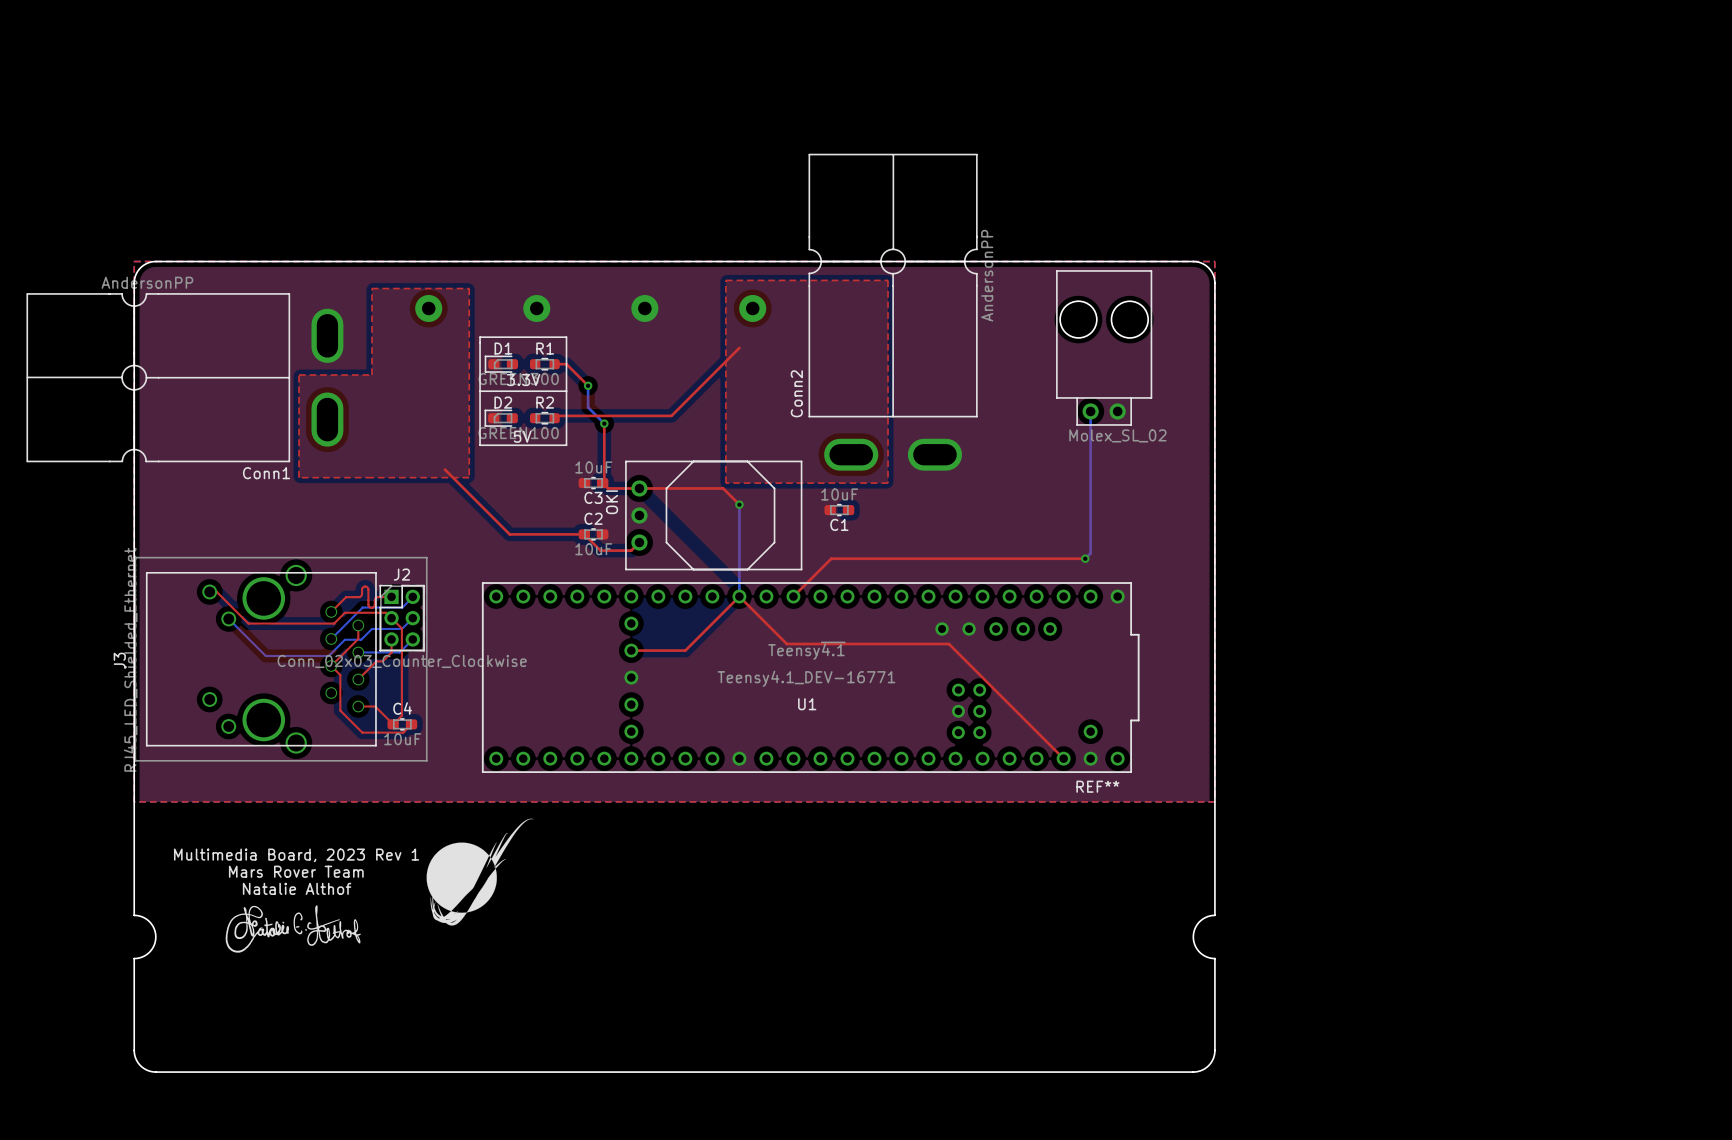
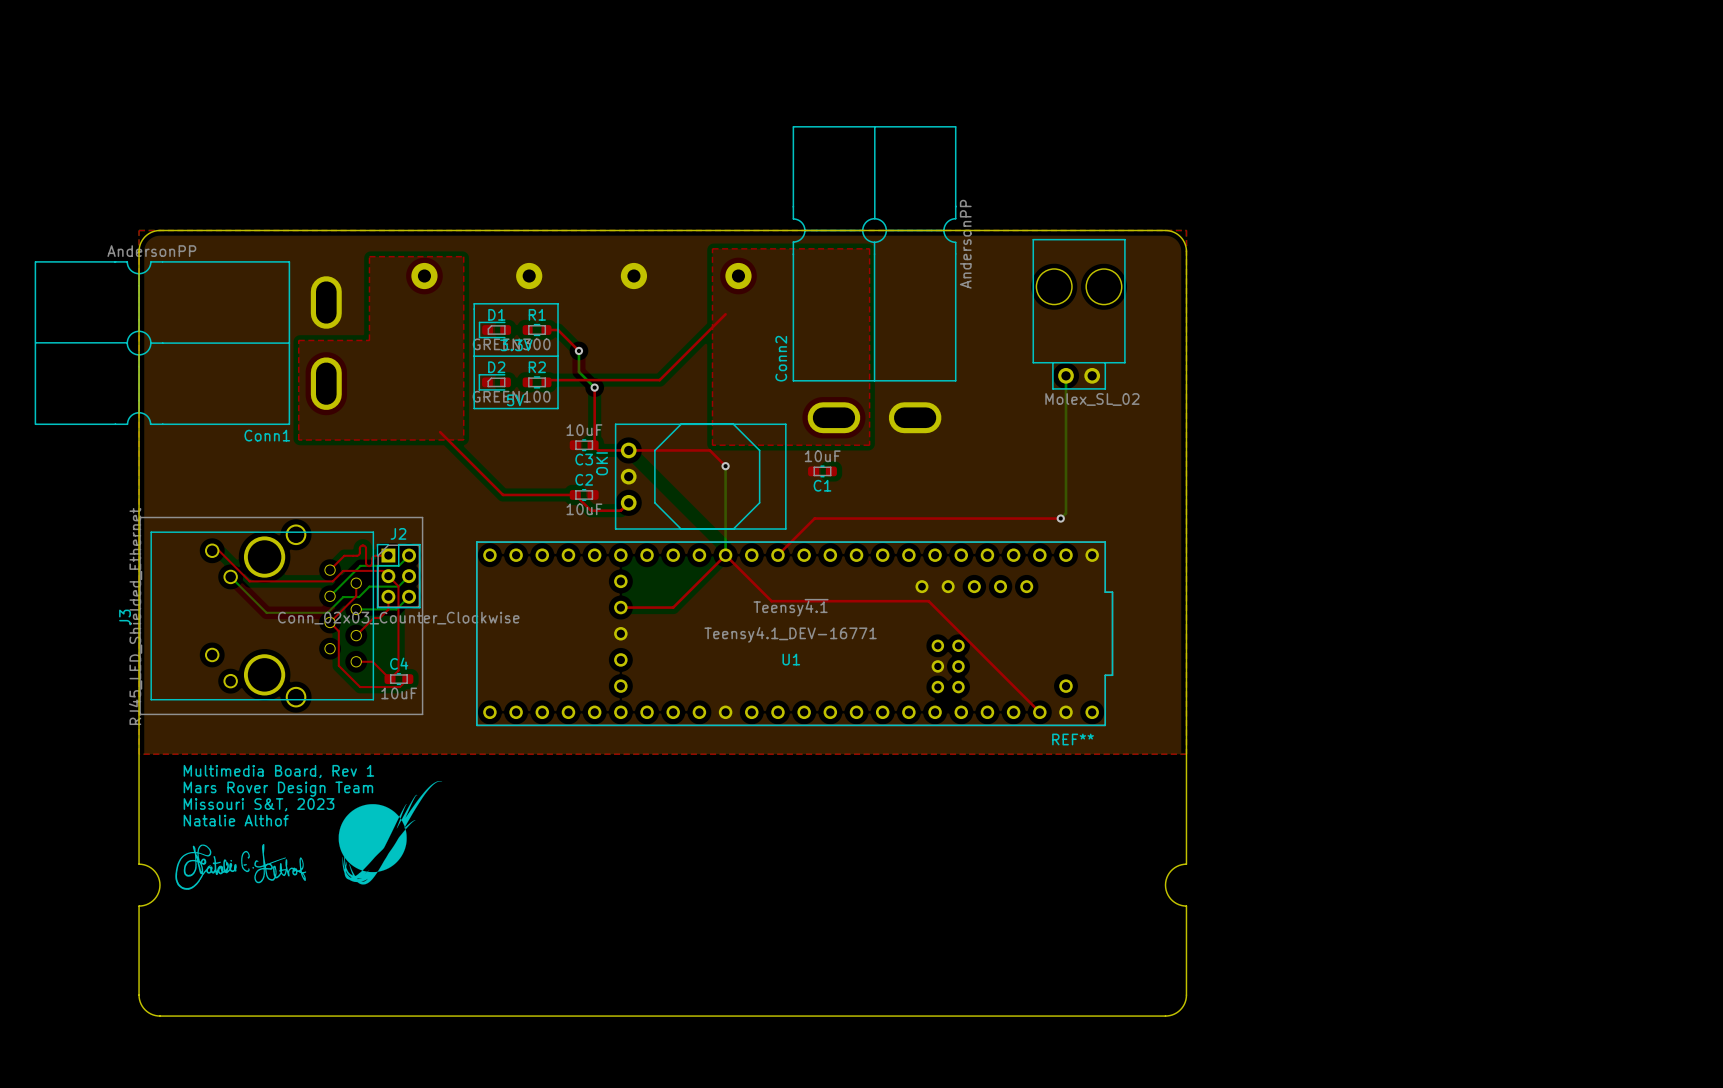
text: none -> Multimedia Board, Rev 1 (278, 771)
text: none -> Mars Rover Design Team (278, 789)
text: none -> Missouri S&T, 2023 (259, 804)
text: Multimedia Board, 2023 Rev 1 (296, 855) -> none
text: Mars Rover Team (296, 871) -> none
drawing position: (480, 872) -> (390, 832)
text position: Natalie Althof (297, 888) -> Natalie Althof (236, 820)
drawing position: (293, 928) -> (240, 866)

